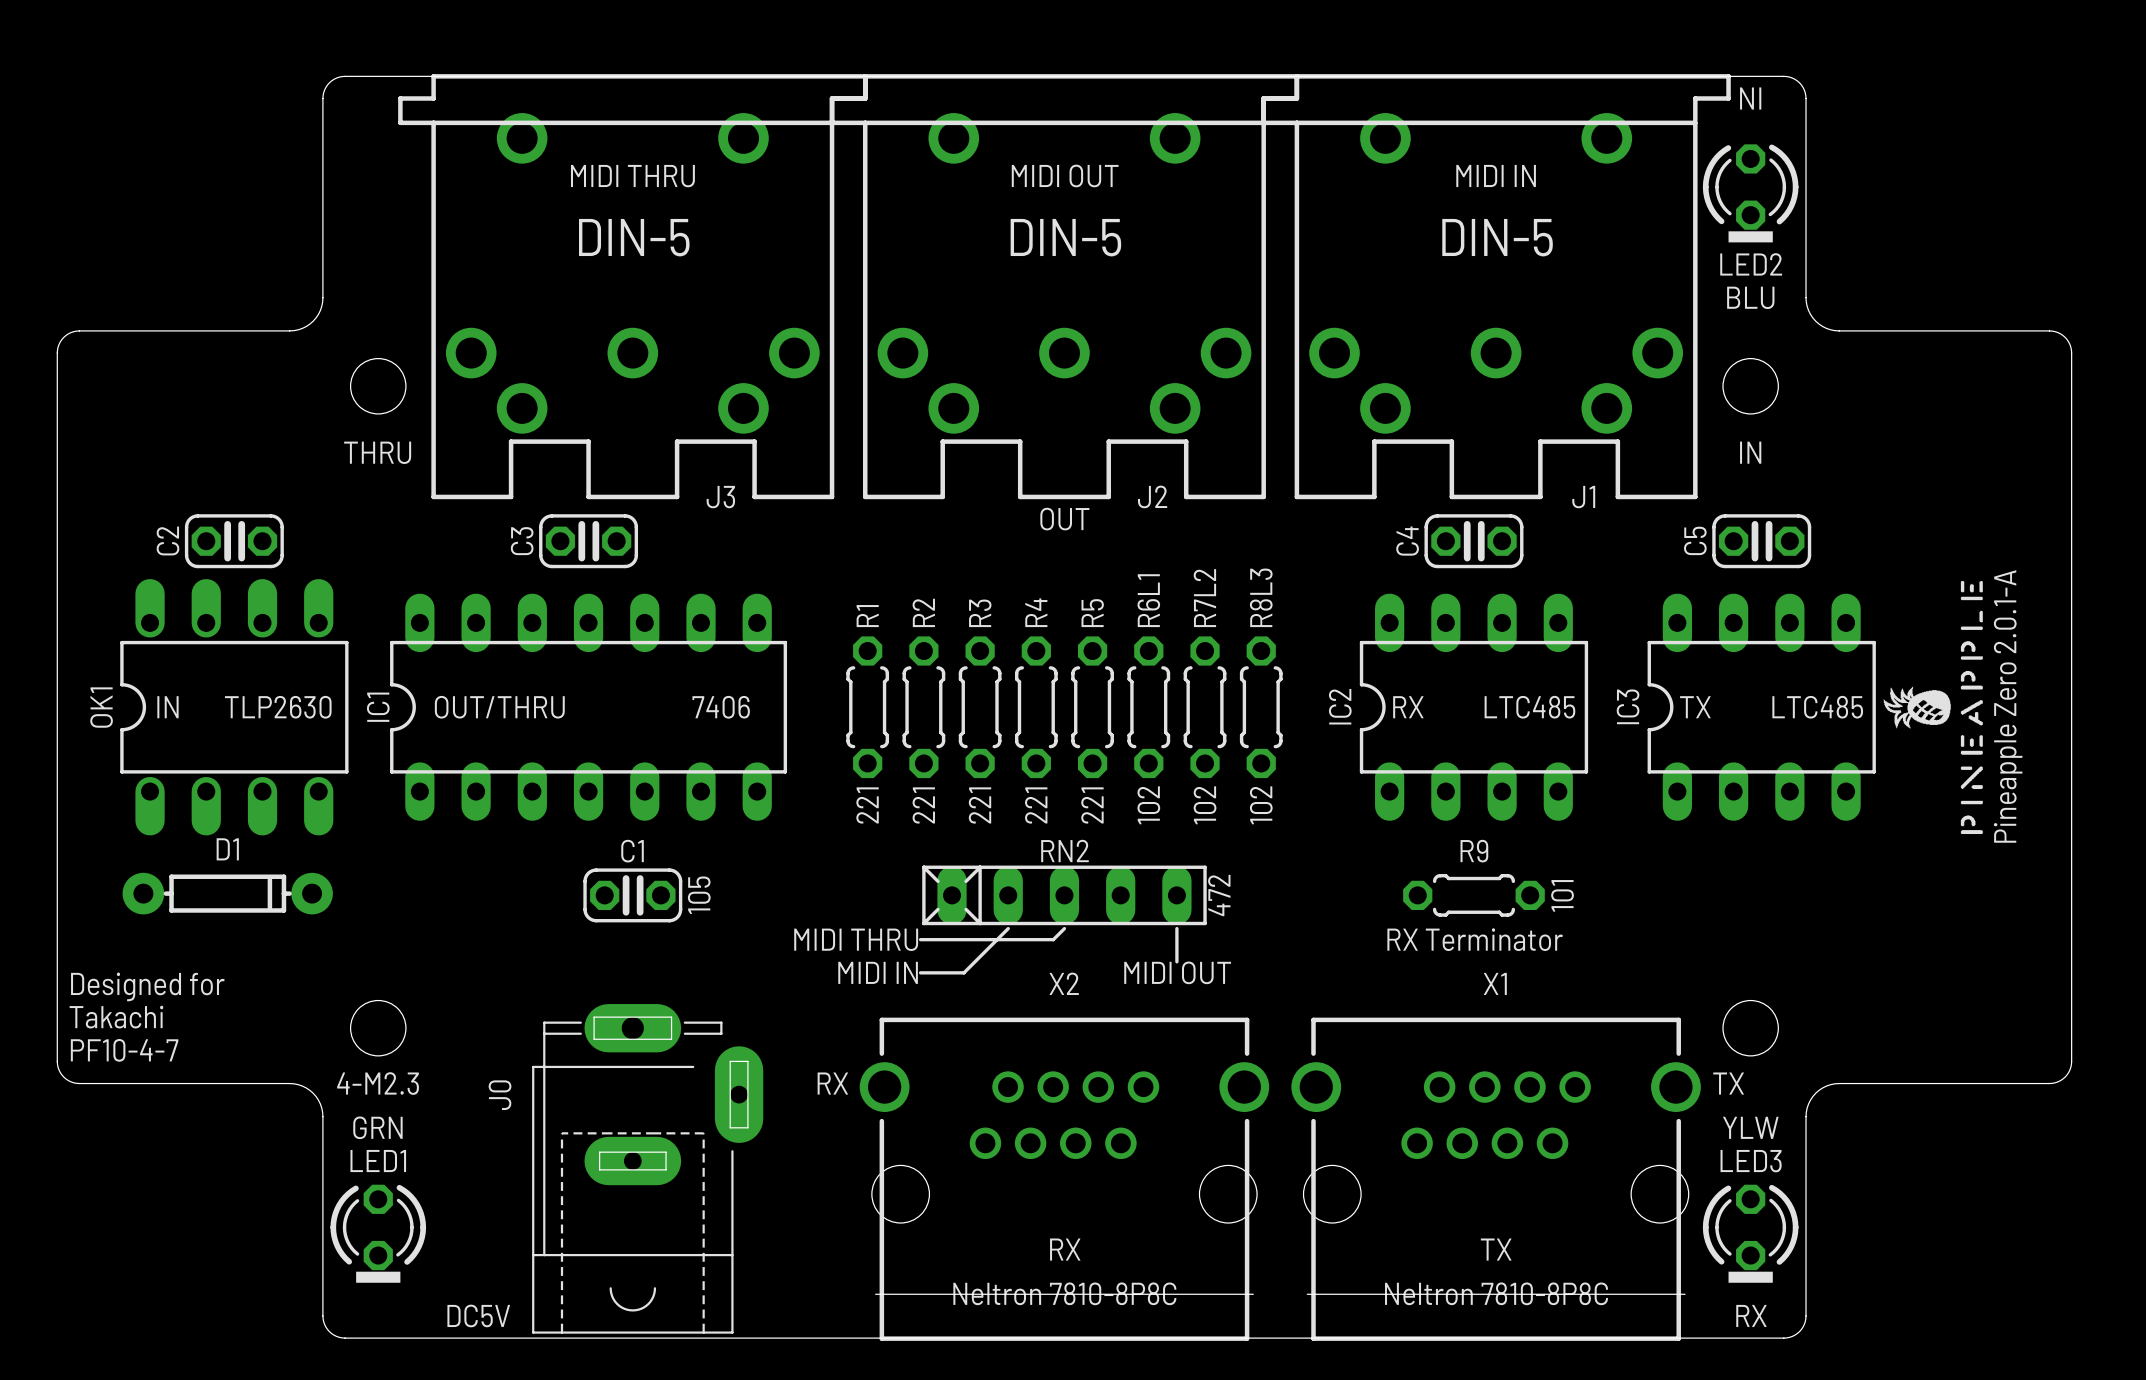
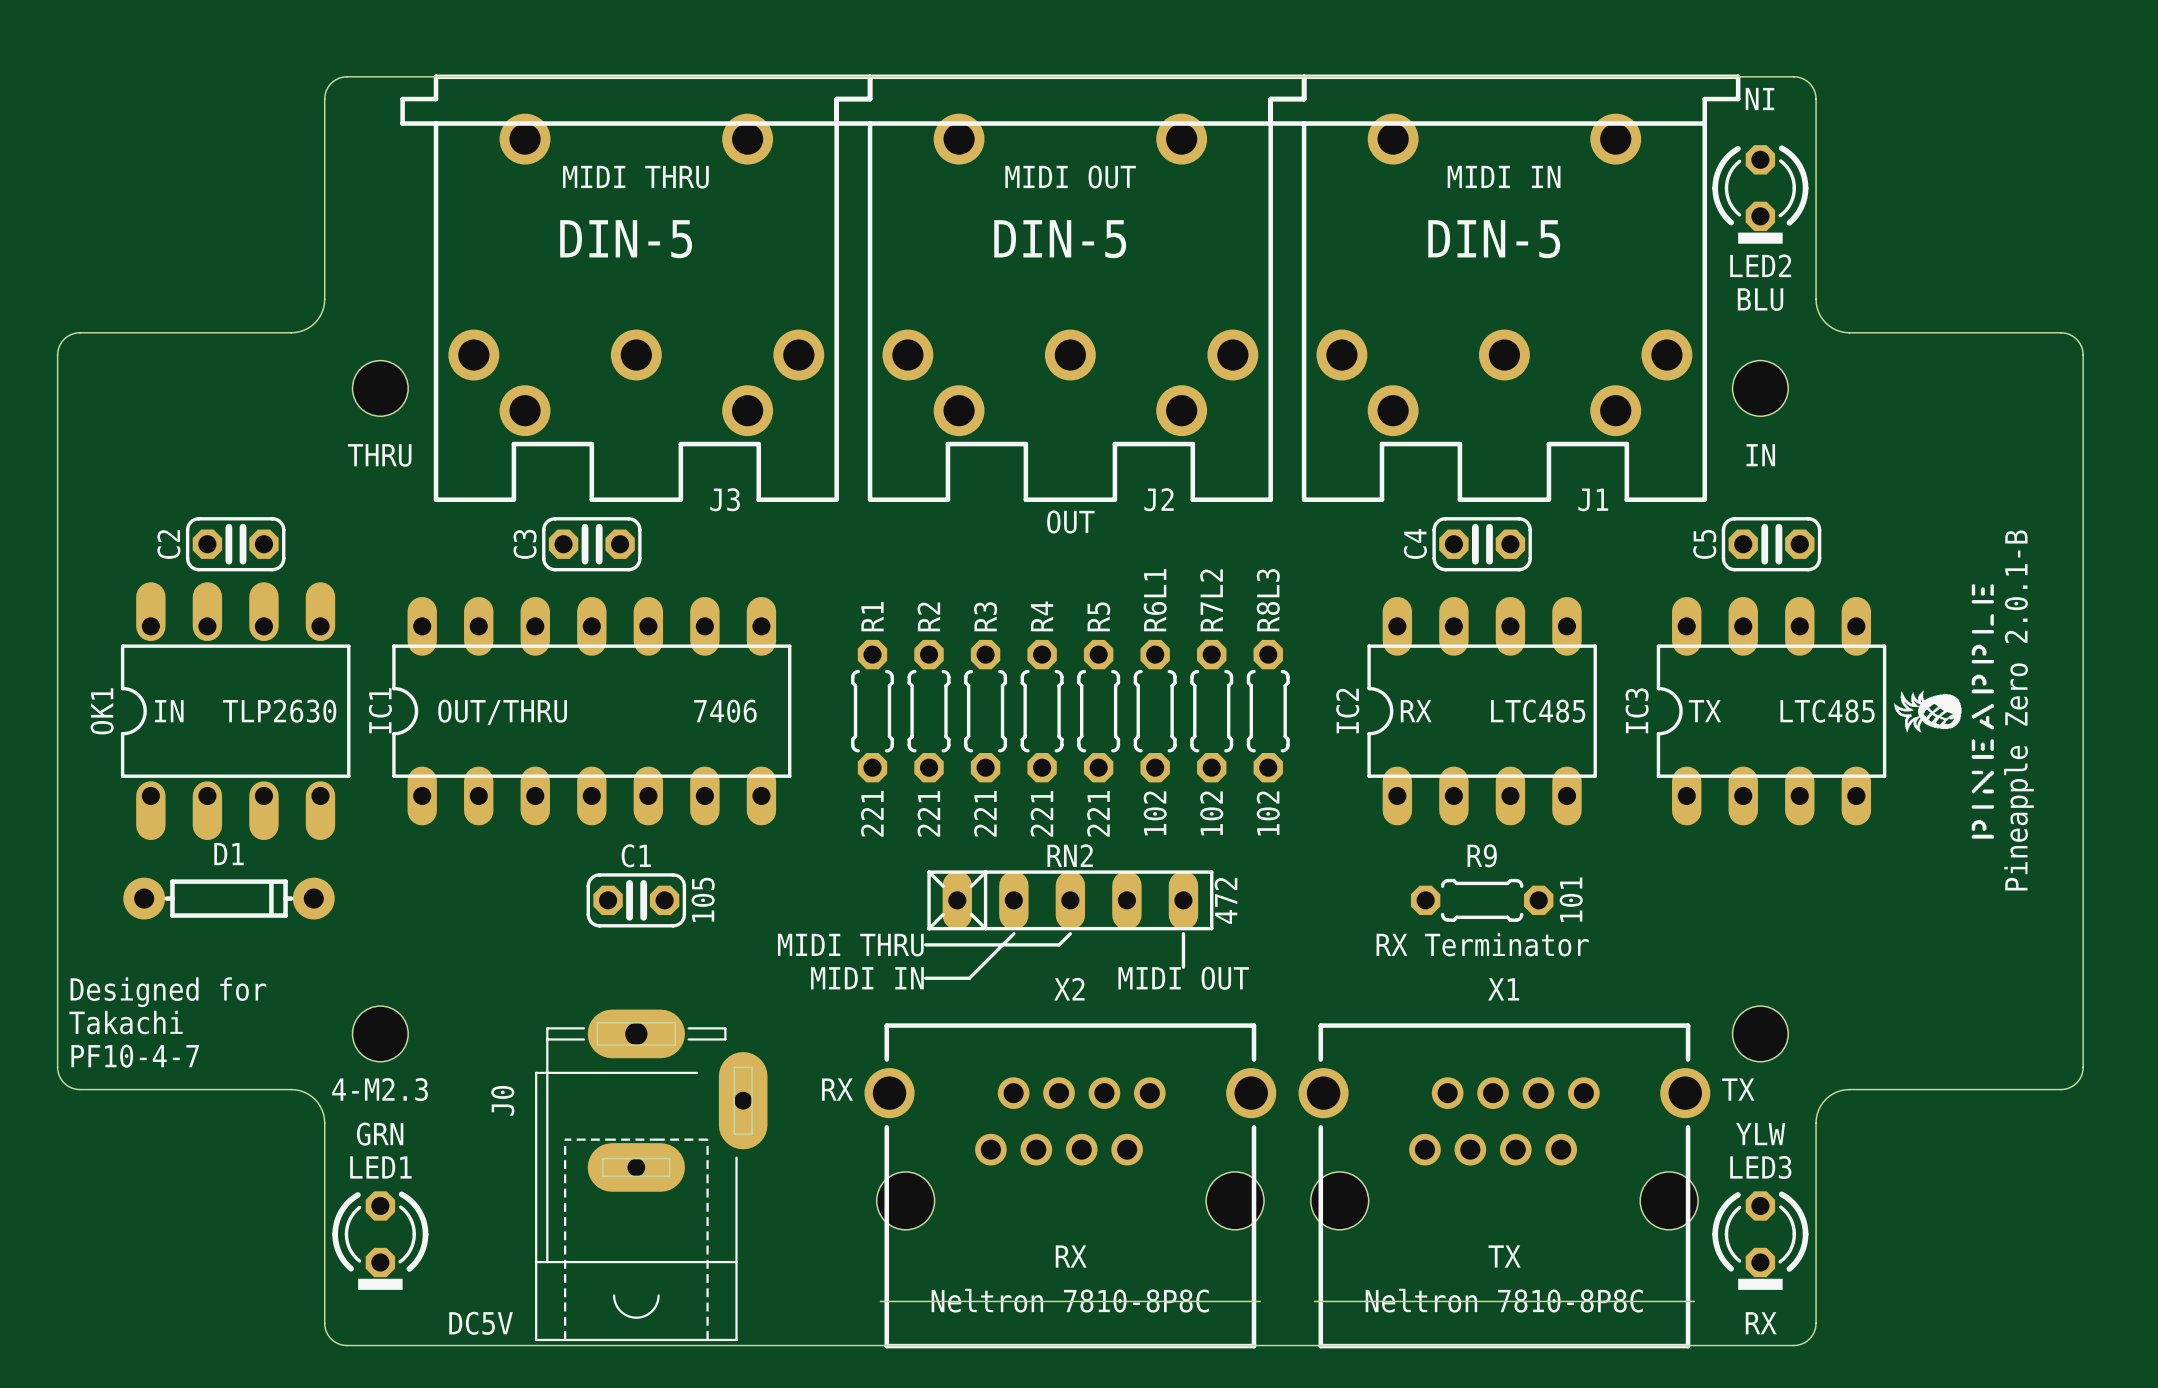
text: Pineapple Zero 2.0.1-A (2008, 706) -> Pineapple Zero 2.0.1-B (2019, 710)

